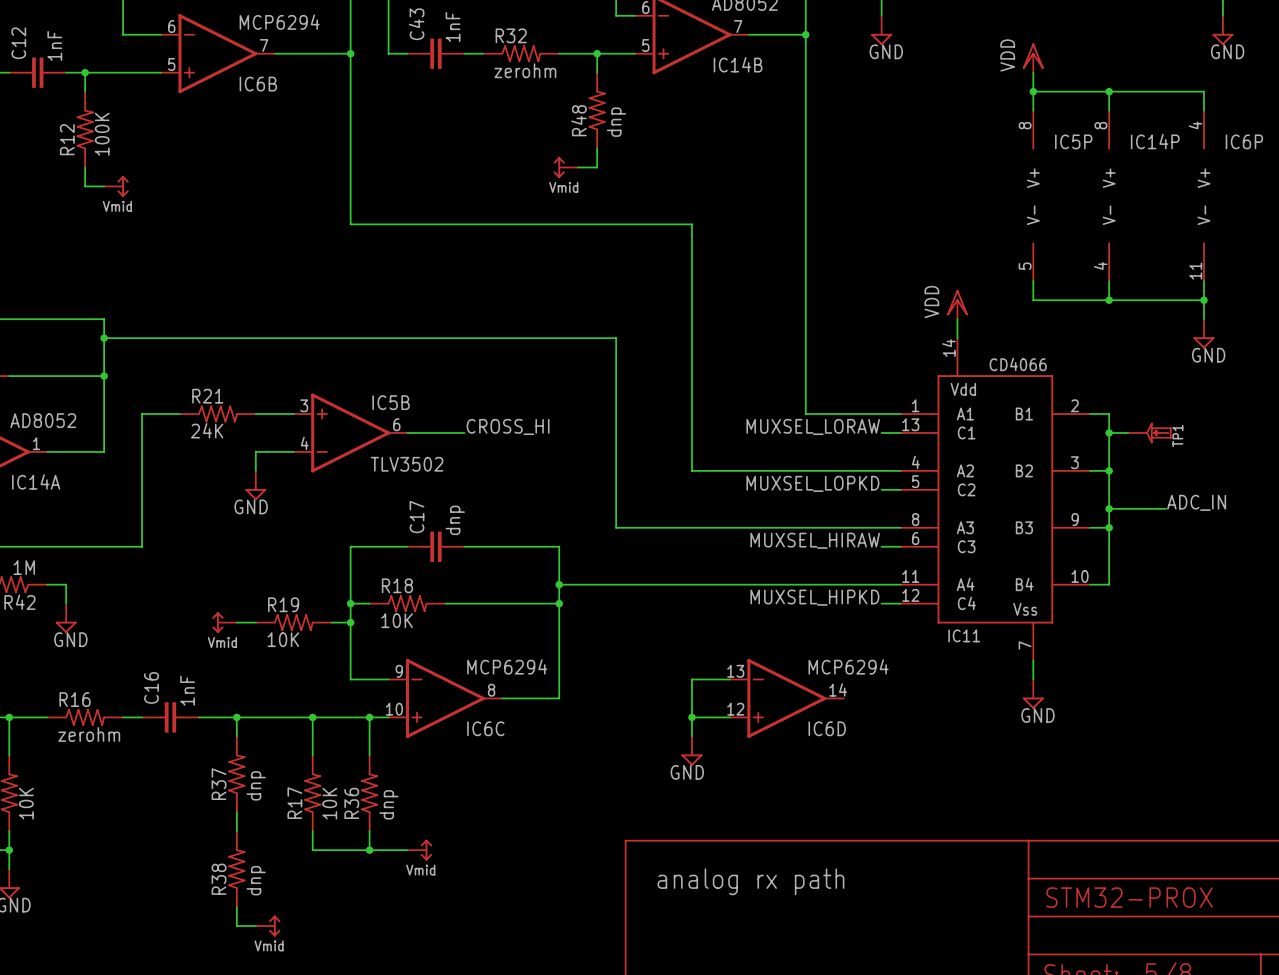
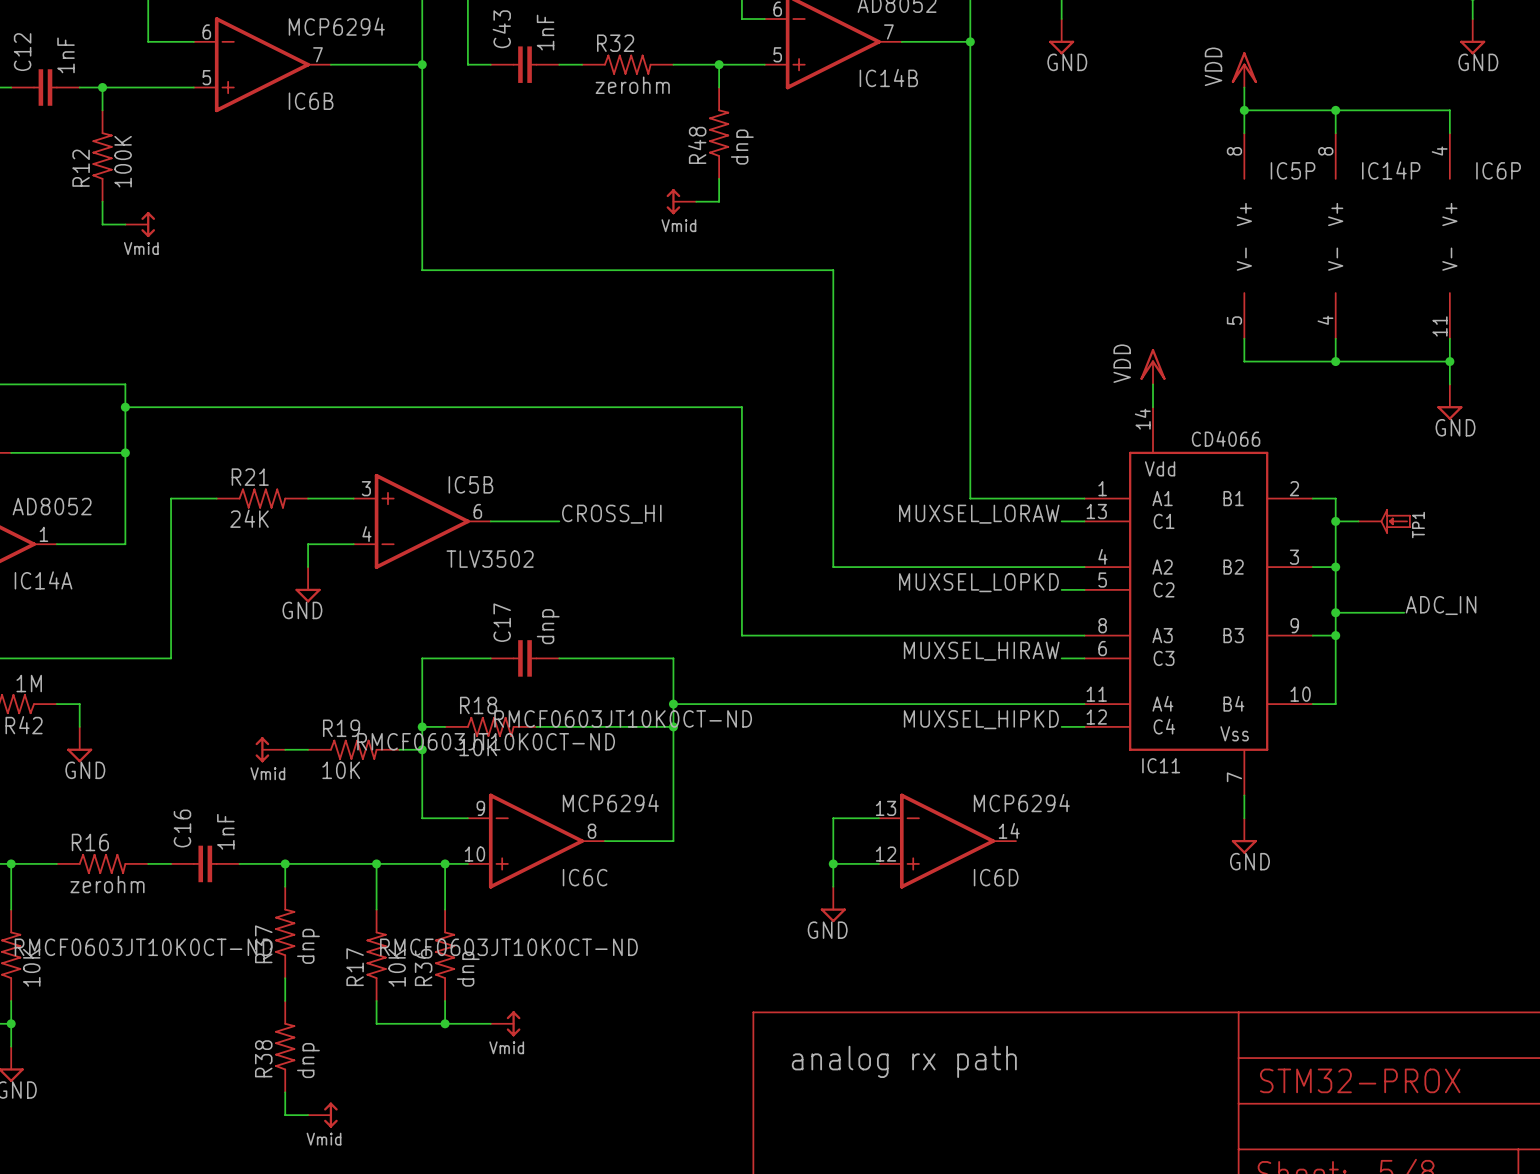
R18 text: none -> RMCF0603JT10K0CT-ND (623, 718)
R19 text: none -> RMCF0603JT10K0CT-ND (486, 741)
part text: none -> RMCF0603JT10K0CT-ND (143, 947)
R17 text: none -> RMCF0603JT10K0CT-ND (508, 947)

